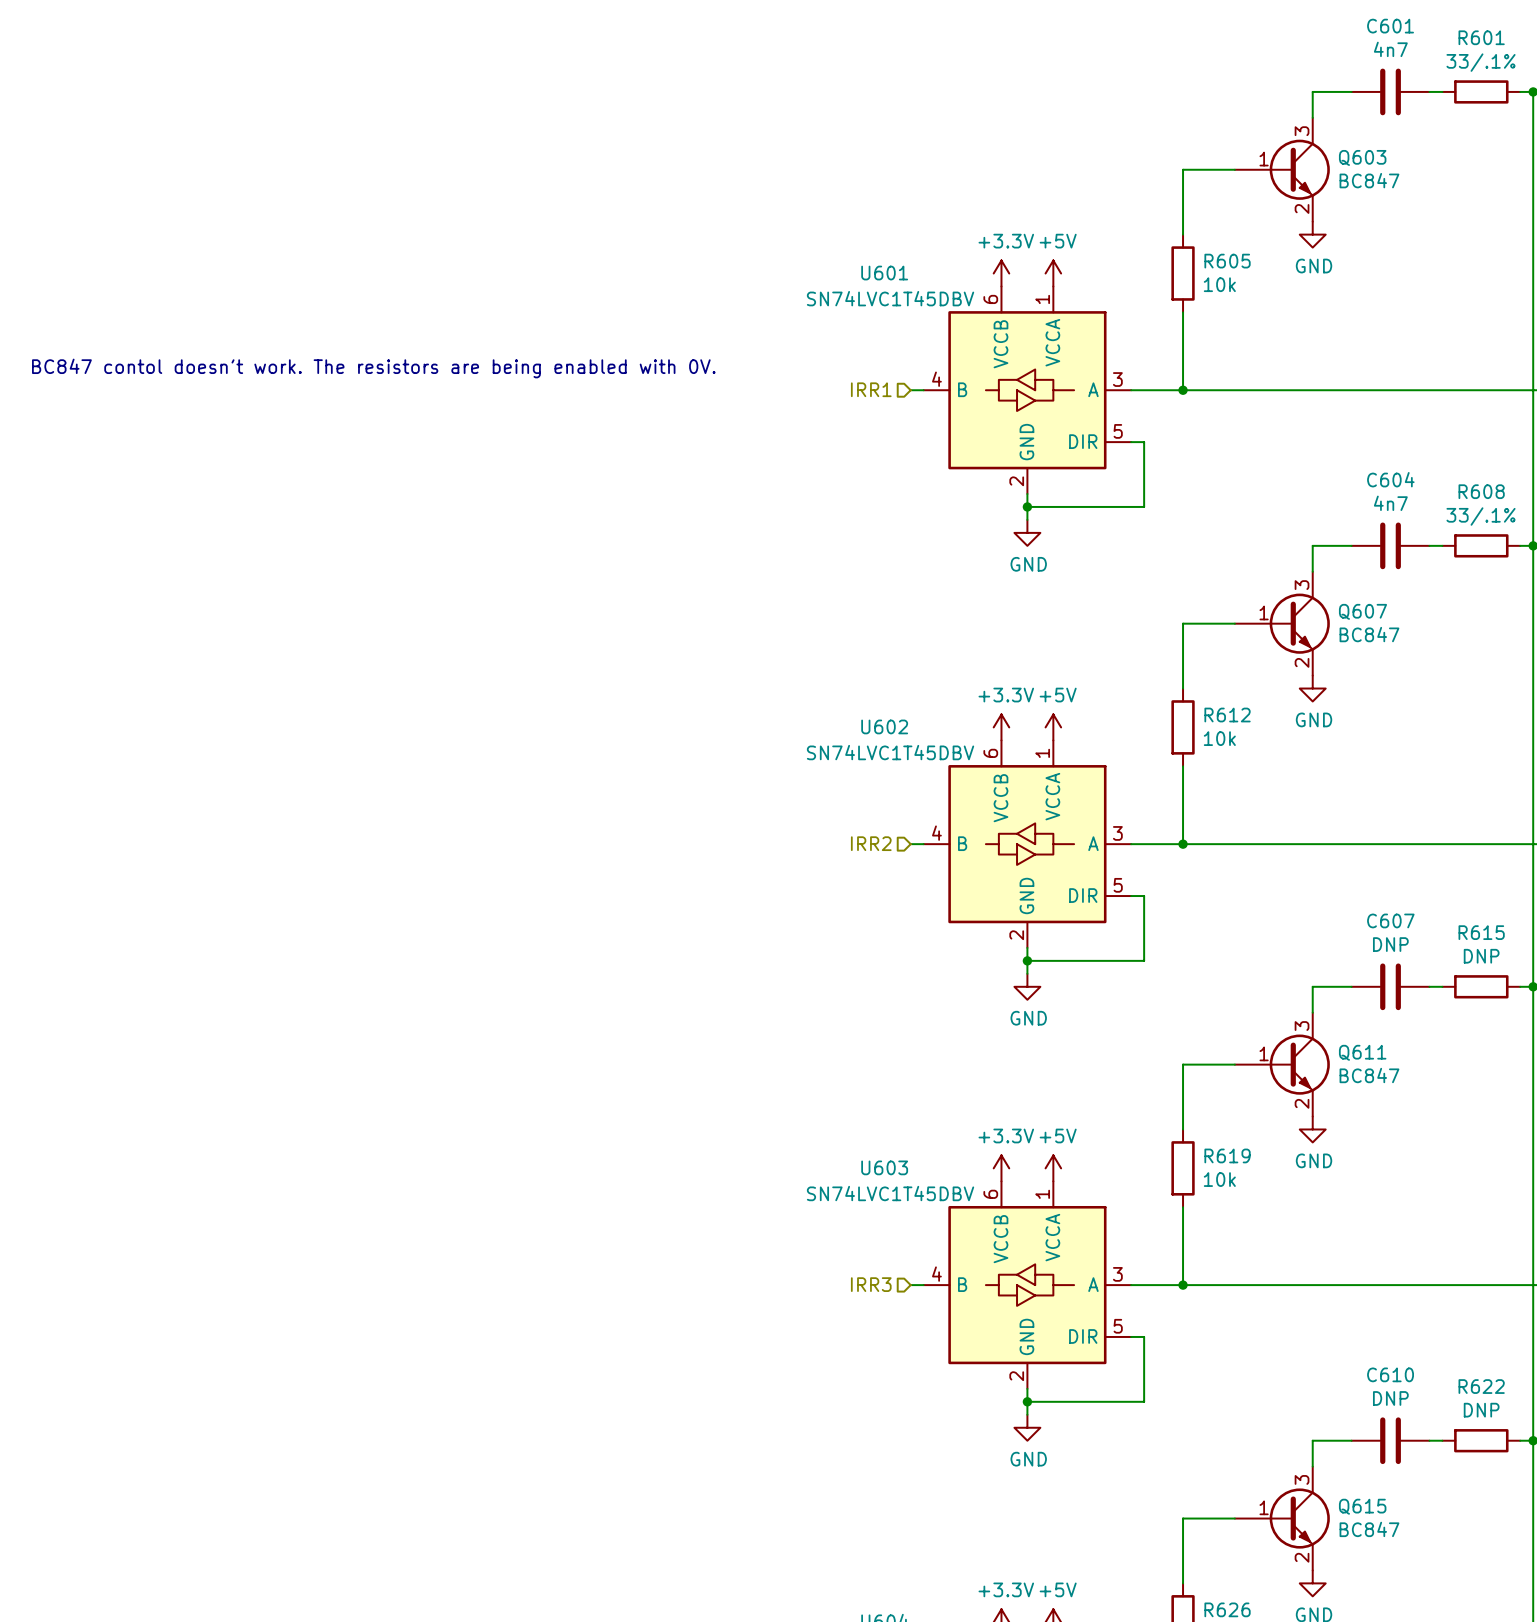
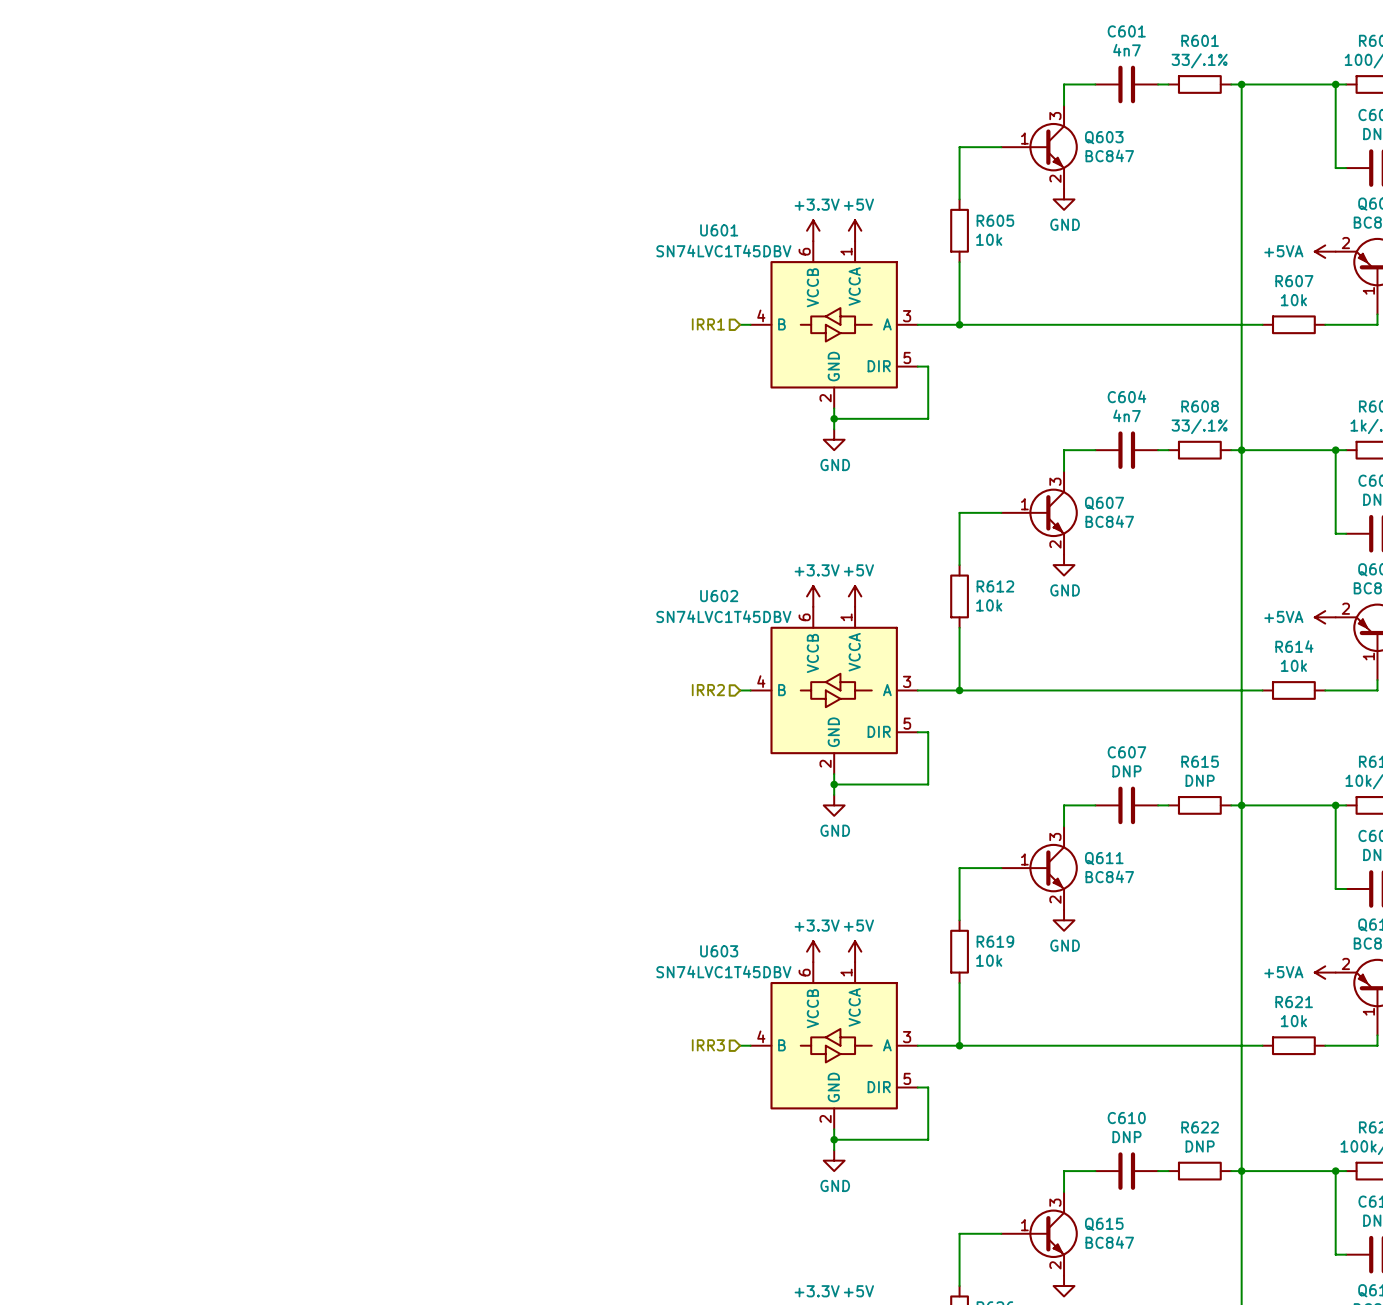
text: BC847 contol doesn't work. The resistors are being enabled with 0V. (373, 368) -> none

